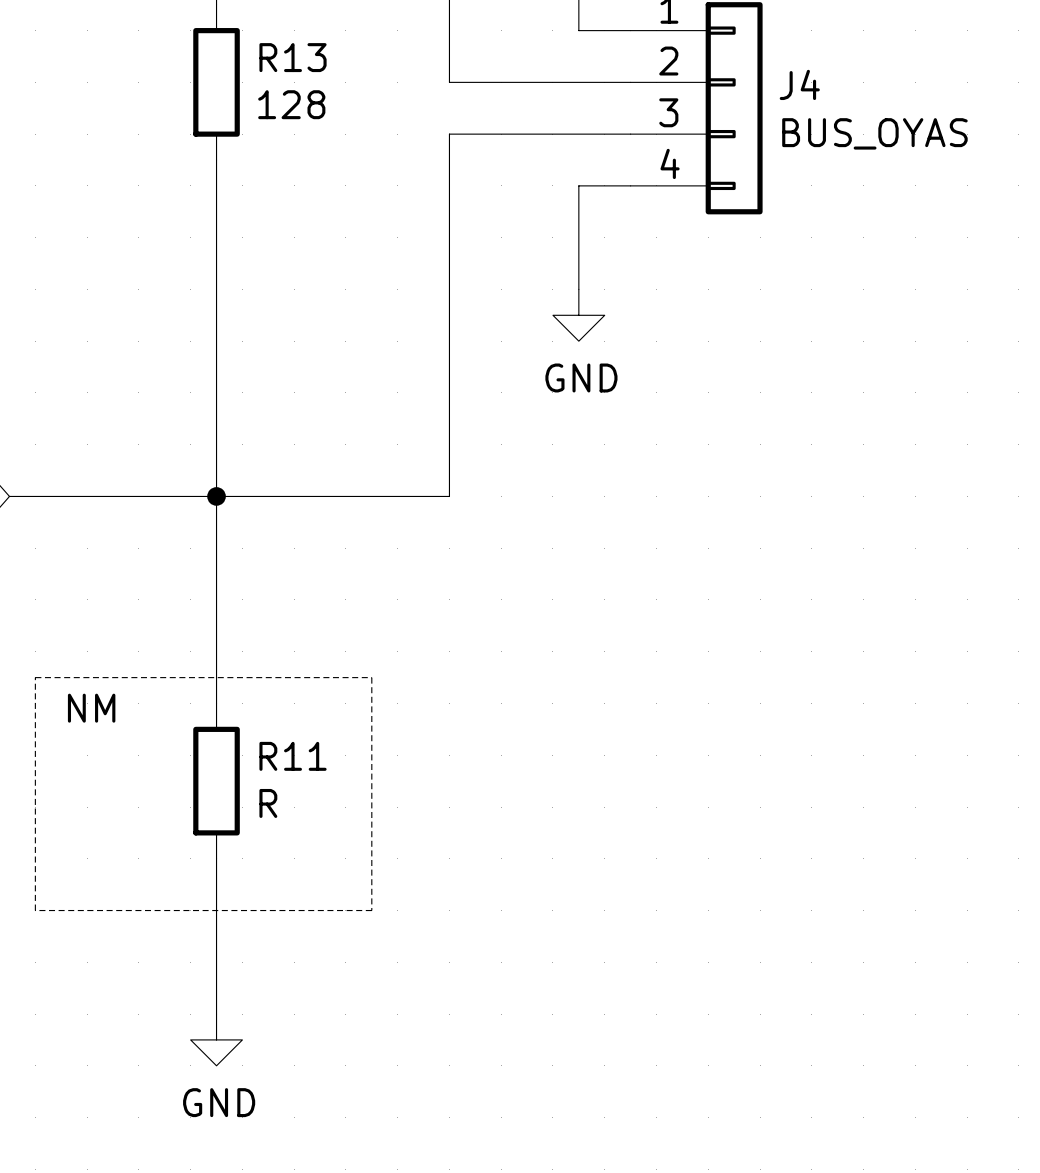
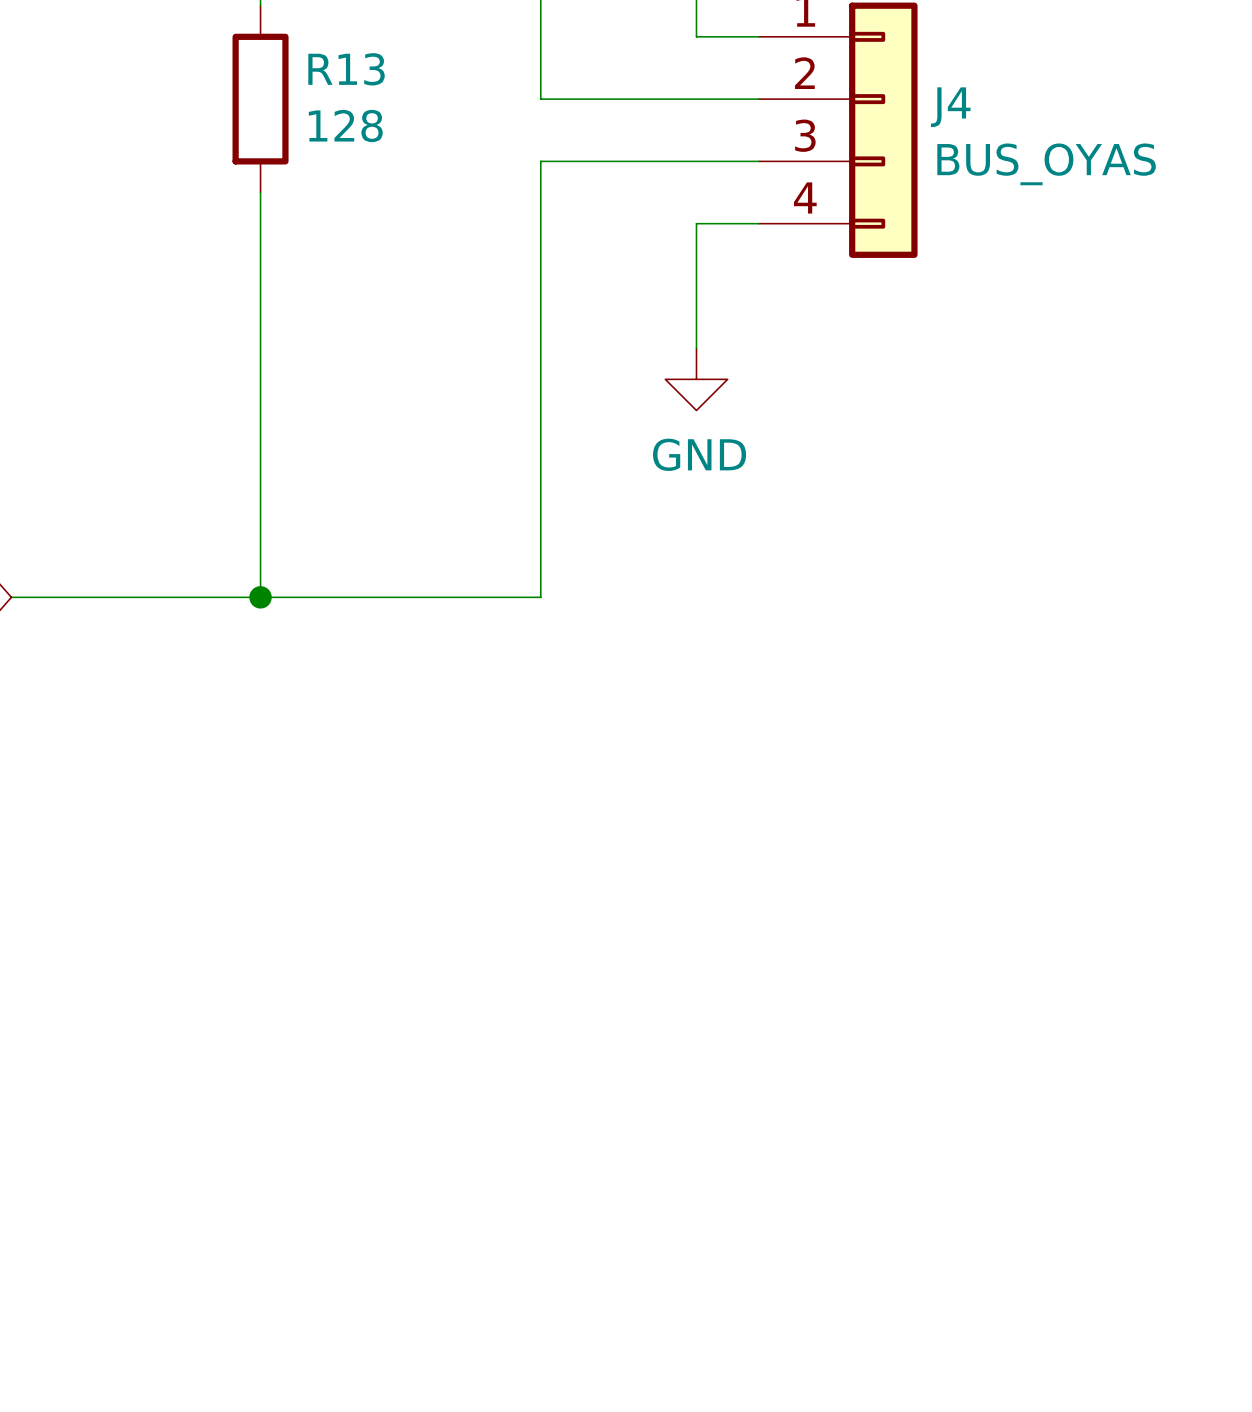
wire: (216, 496) (216, 703) -> none
line: (35, 677) (371, 677) (371, 910) (35, 910) (35, 677) -> none
text: NM (91, 708) -> none
R11: R (216, 781) -> none
wire: (216, 858) (216, 1014) -> none
power symbol: GND (216, 1039) -> none

